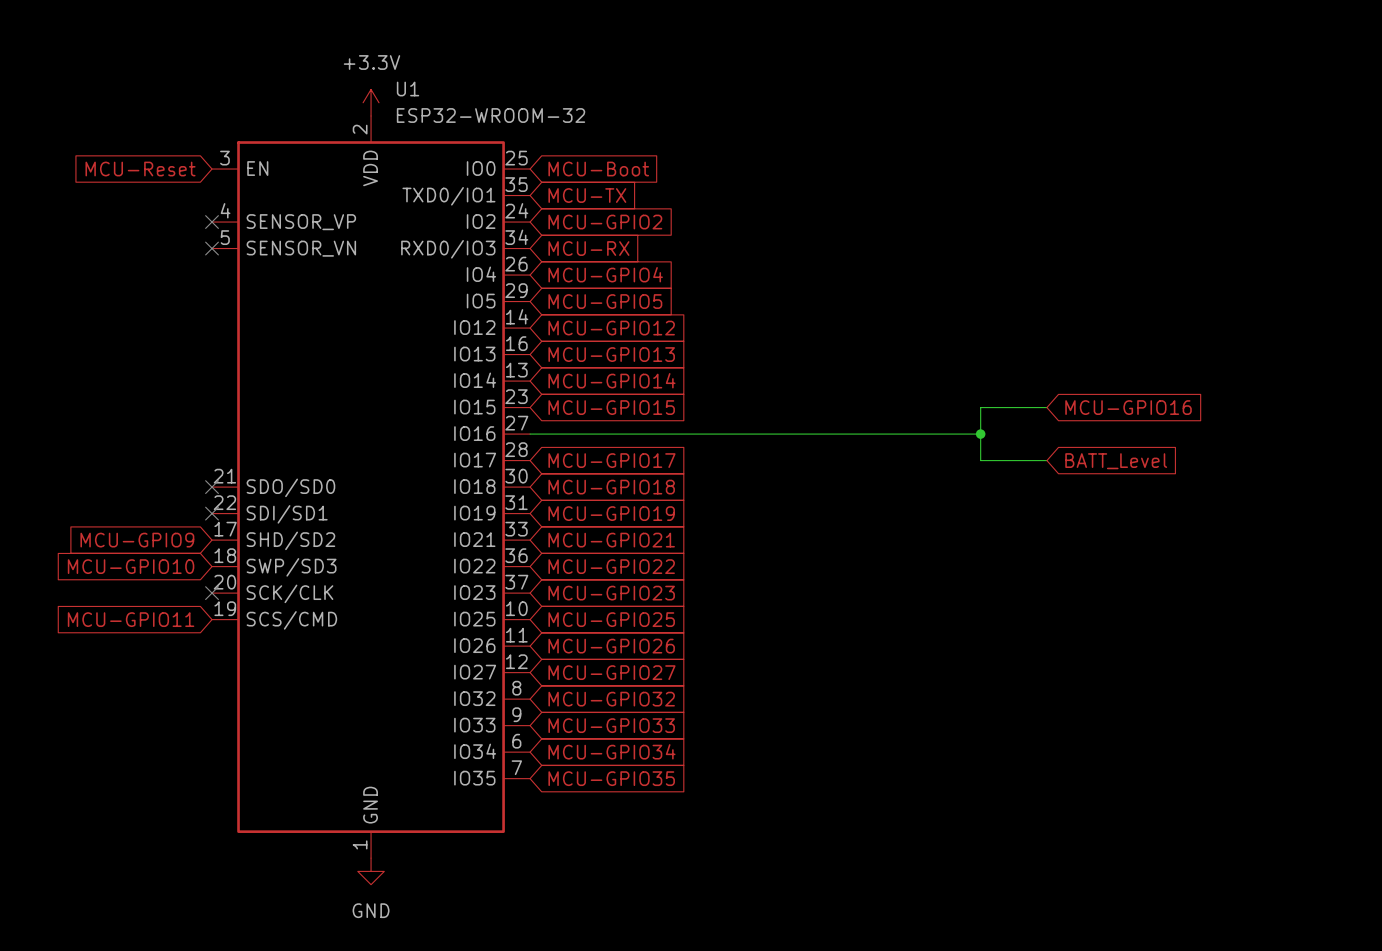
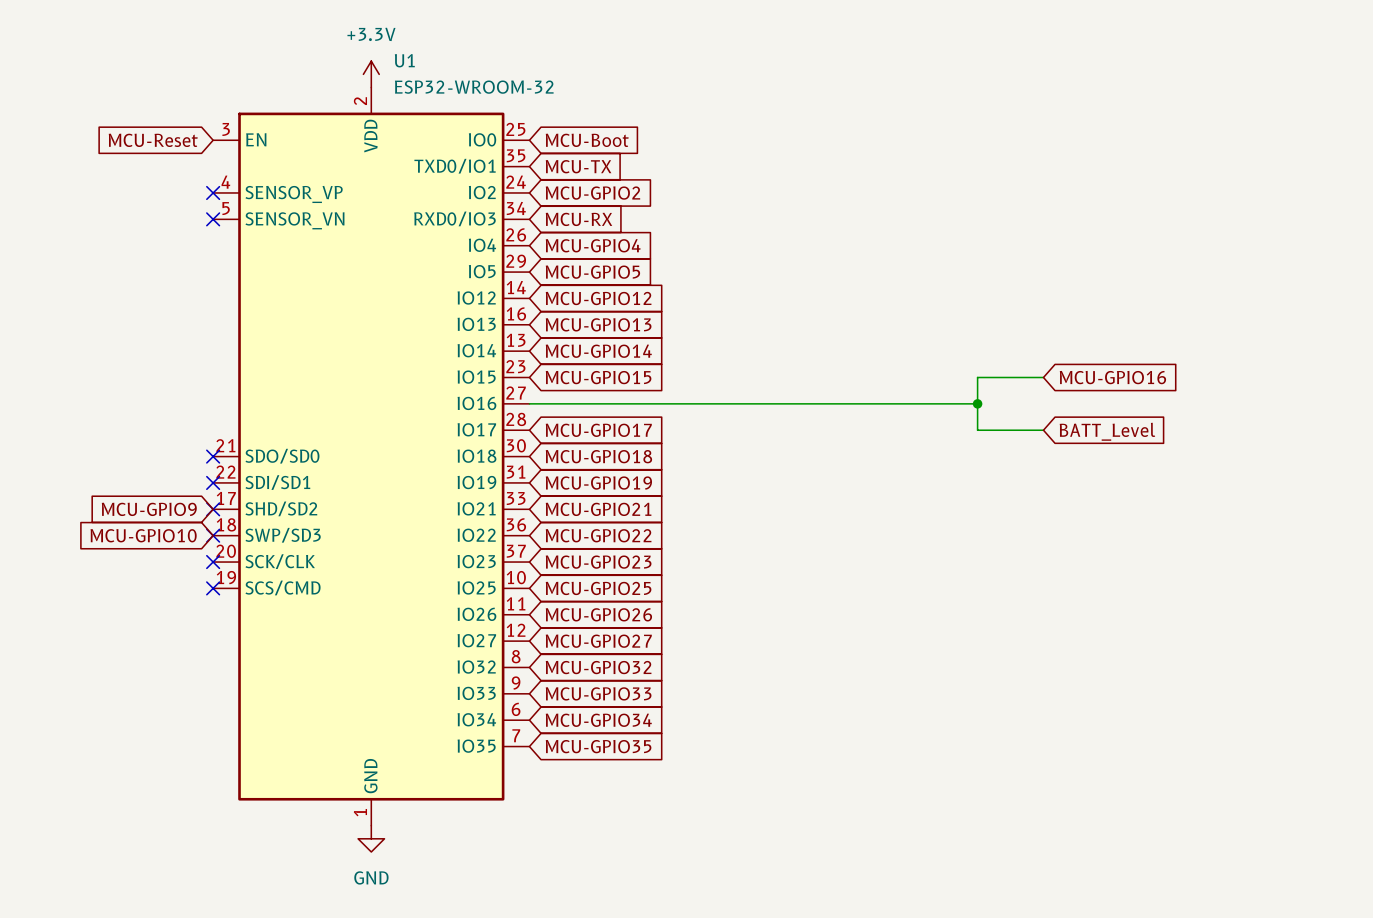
no-connect mark: none -> (213, 509)
no-connect mark: none -> (213, 535)
global label: MCU-GPIO11 (131, 619) -> none
no-connect mark: none -> (213, 588)

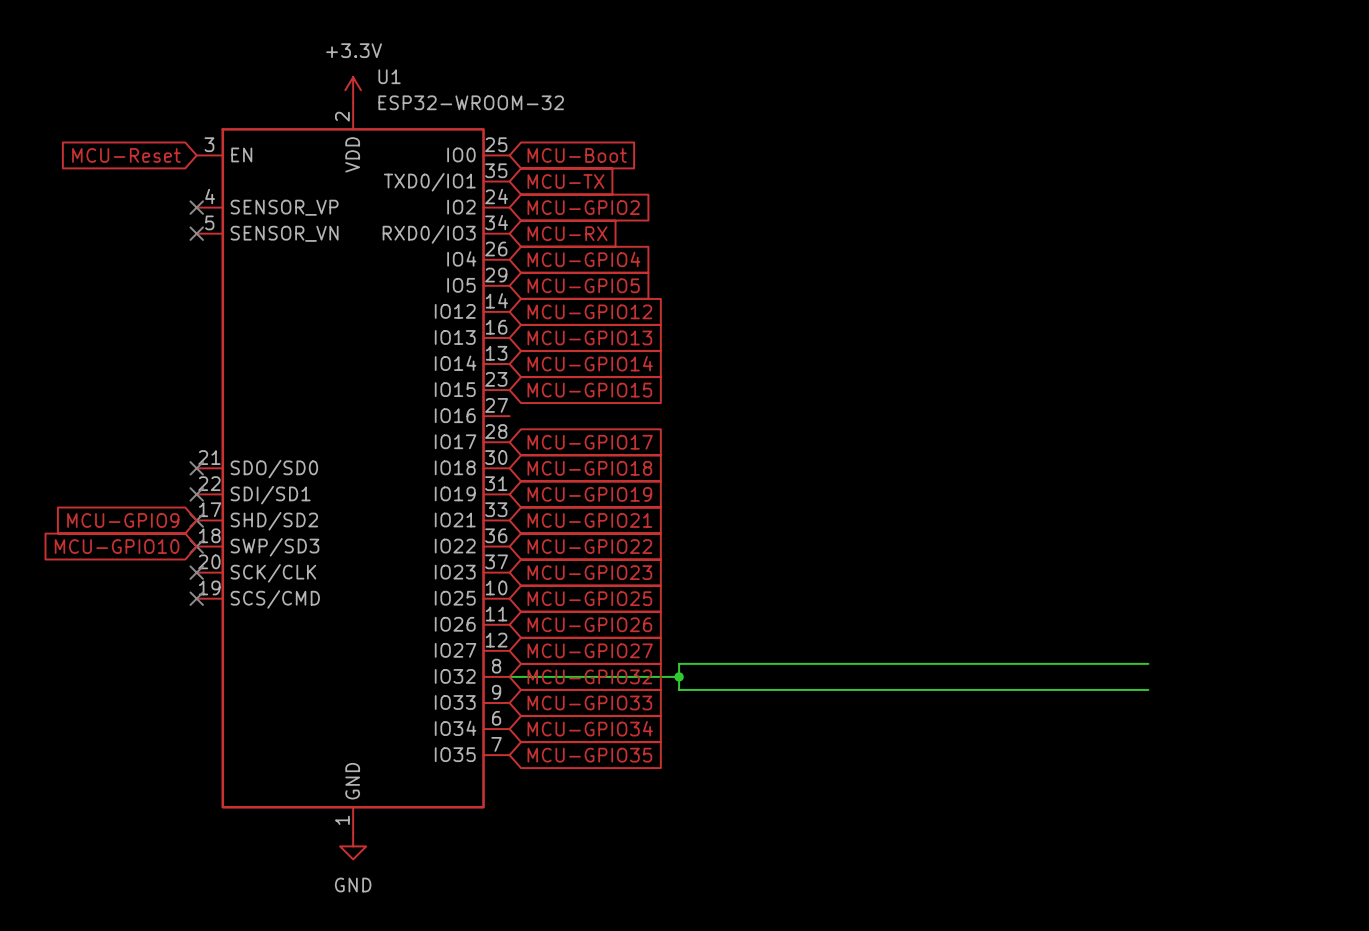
wire: (1043, 377) (977, 377) (977, 430) (1043, 430) -> none
global label: MCU-GPIO16 (1112, 377) -> none
wire: (529, 403) (977, 403) -> none
junction: (977, 403) -> none
global label: BATT_Level (1107, 431) -> none
wire: none -> (1148, 663) (679, 663) (679, 689) (1148, 689)
wire: none -> (509, 676) (679, 676)
junction: none -> (679, 676)

